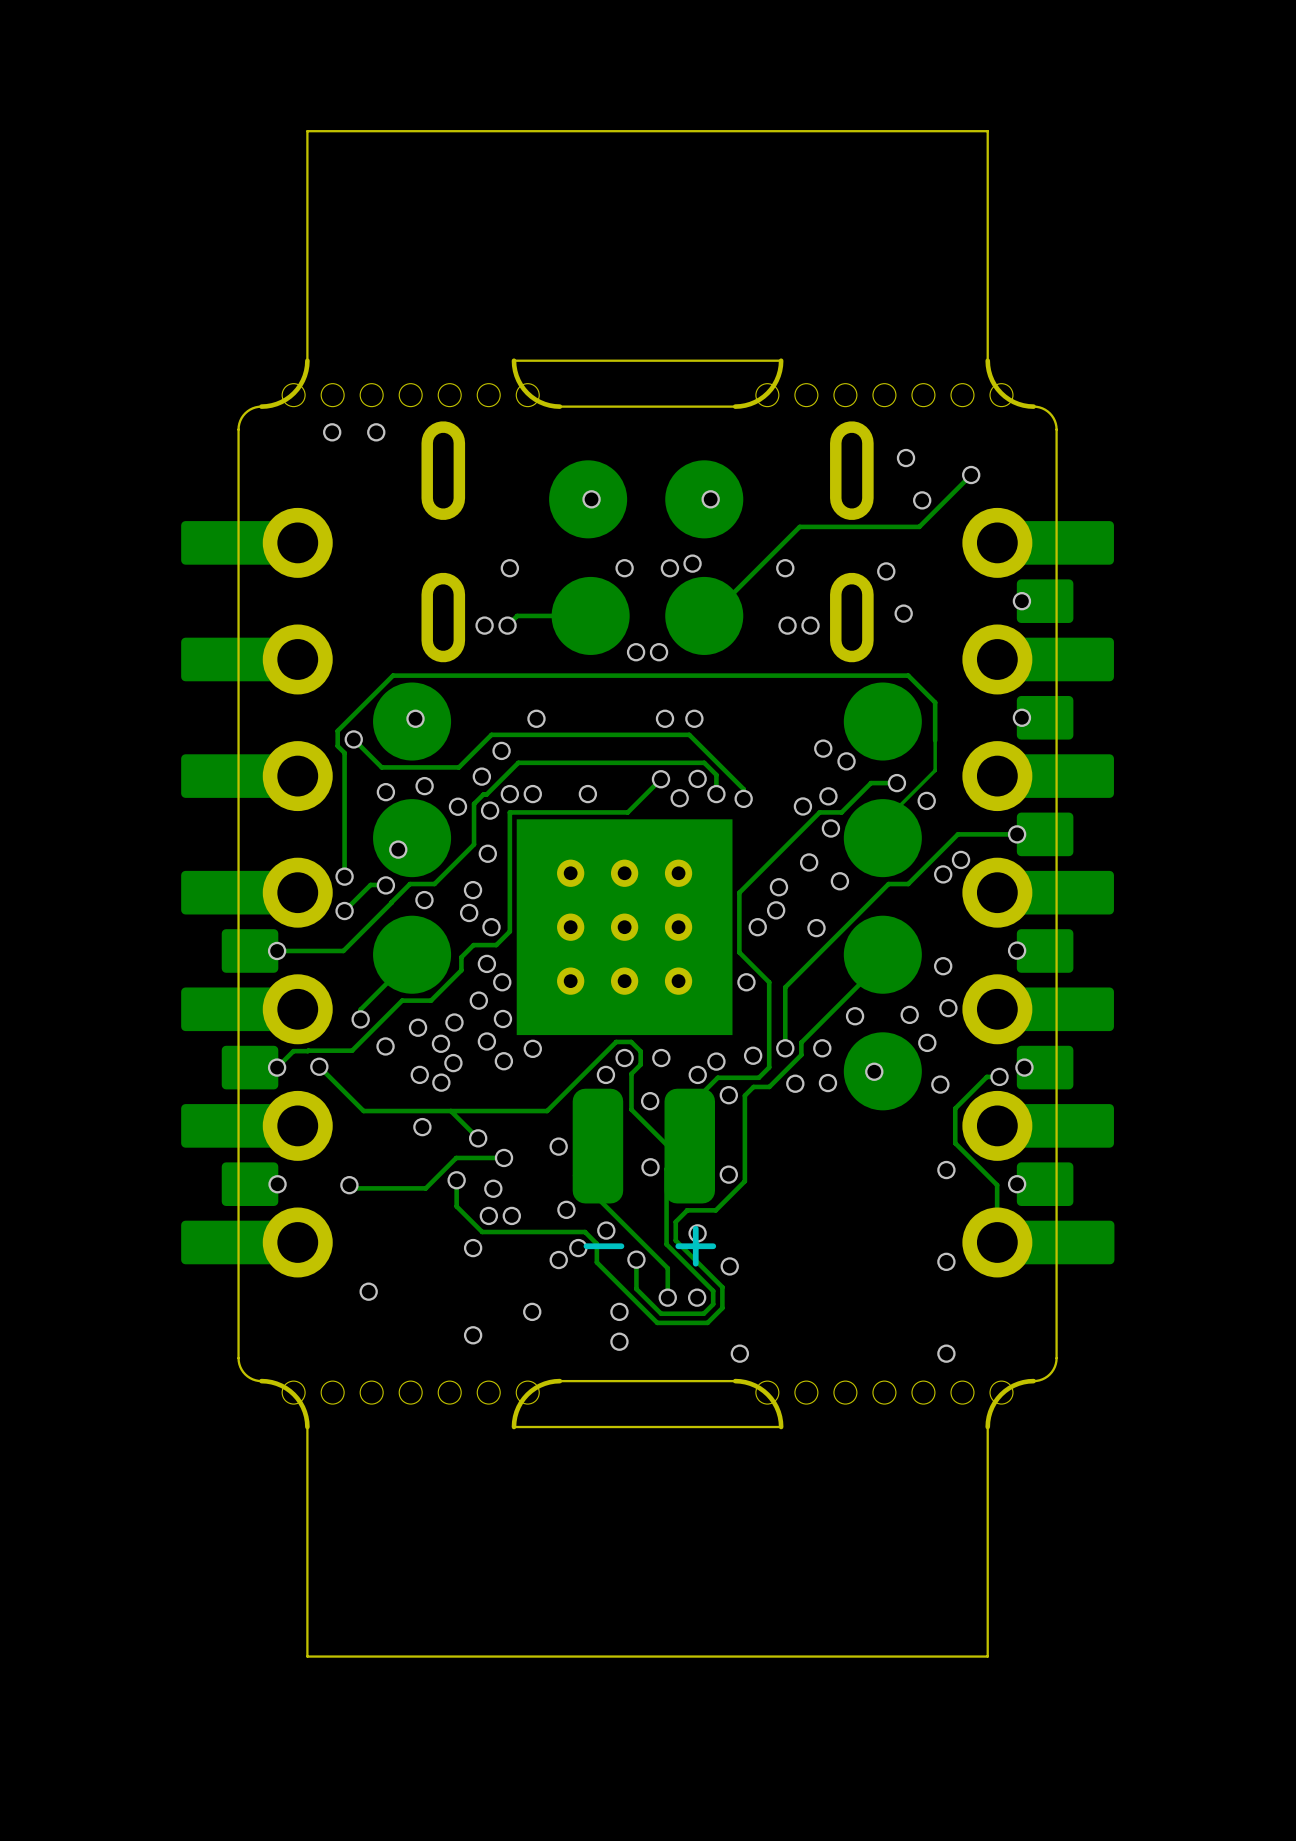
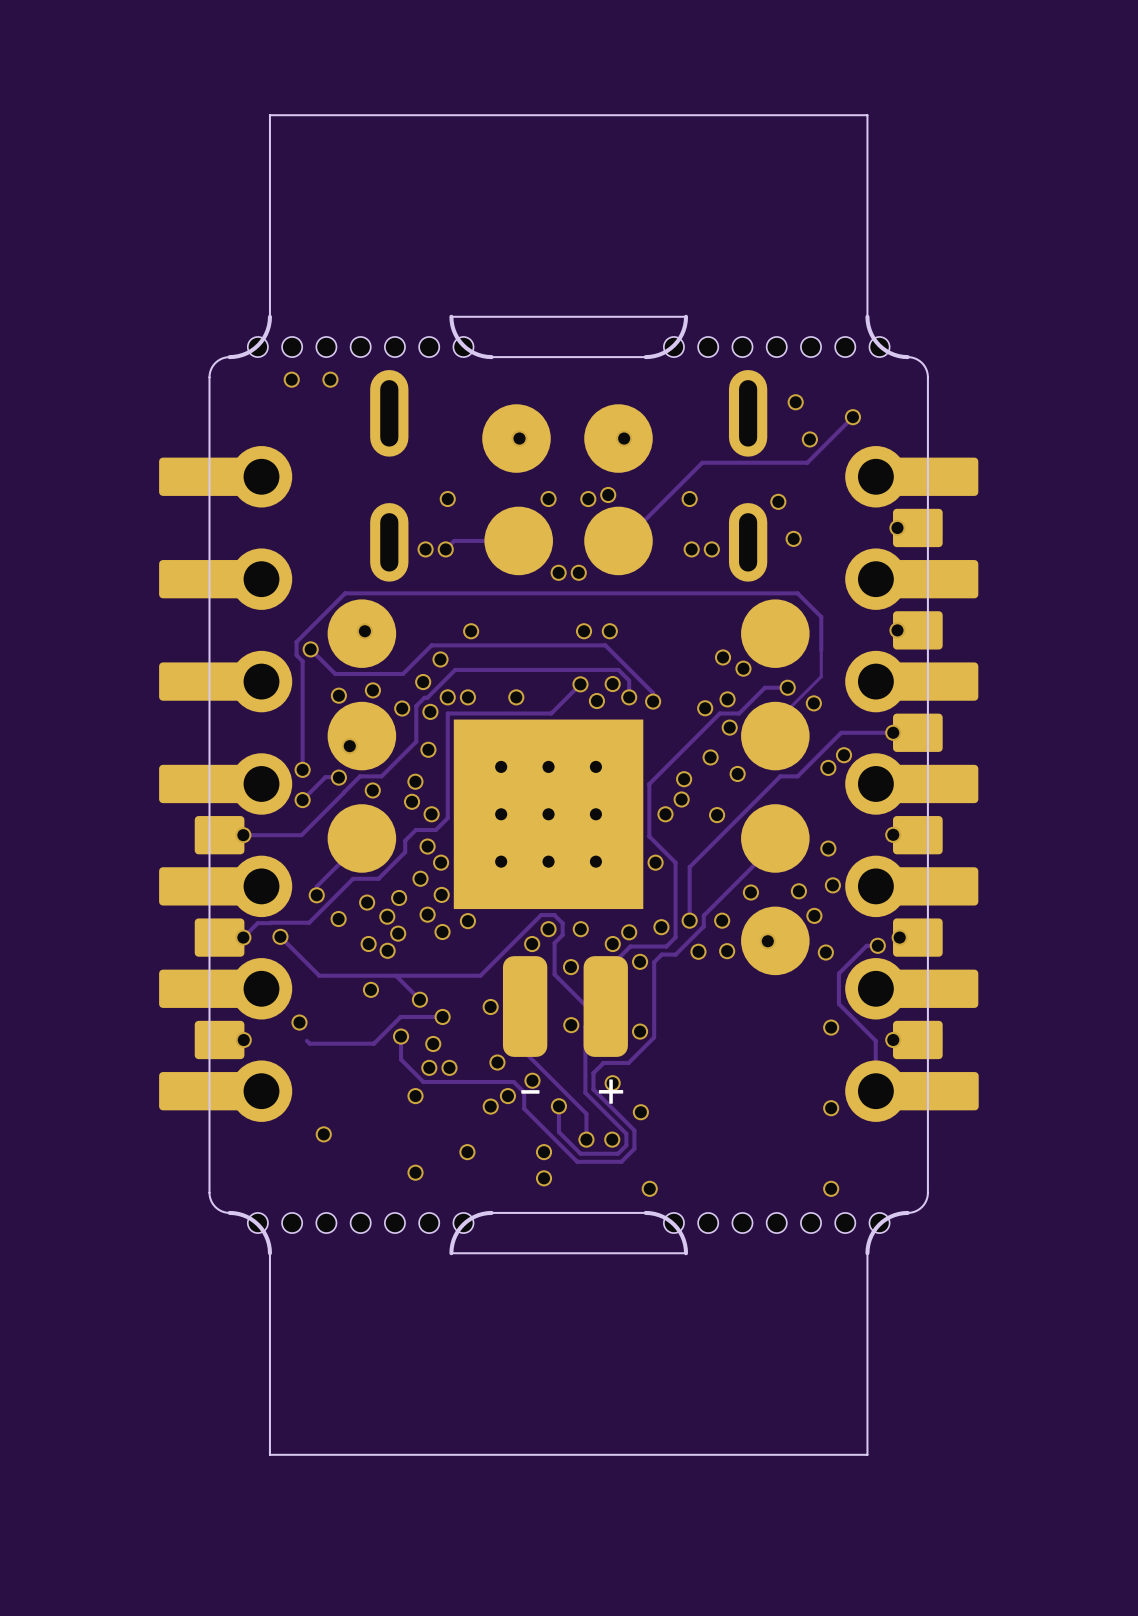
via position: (349, 1185) -> (299, 1022)

